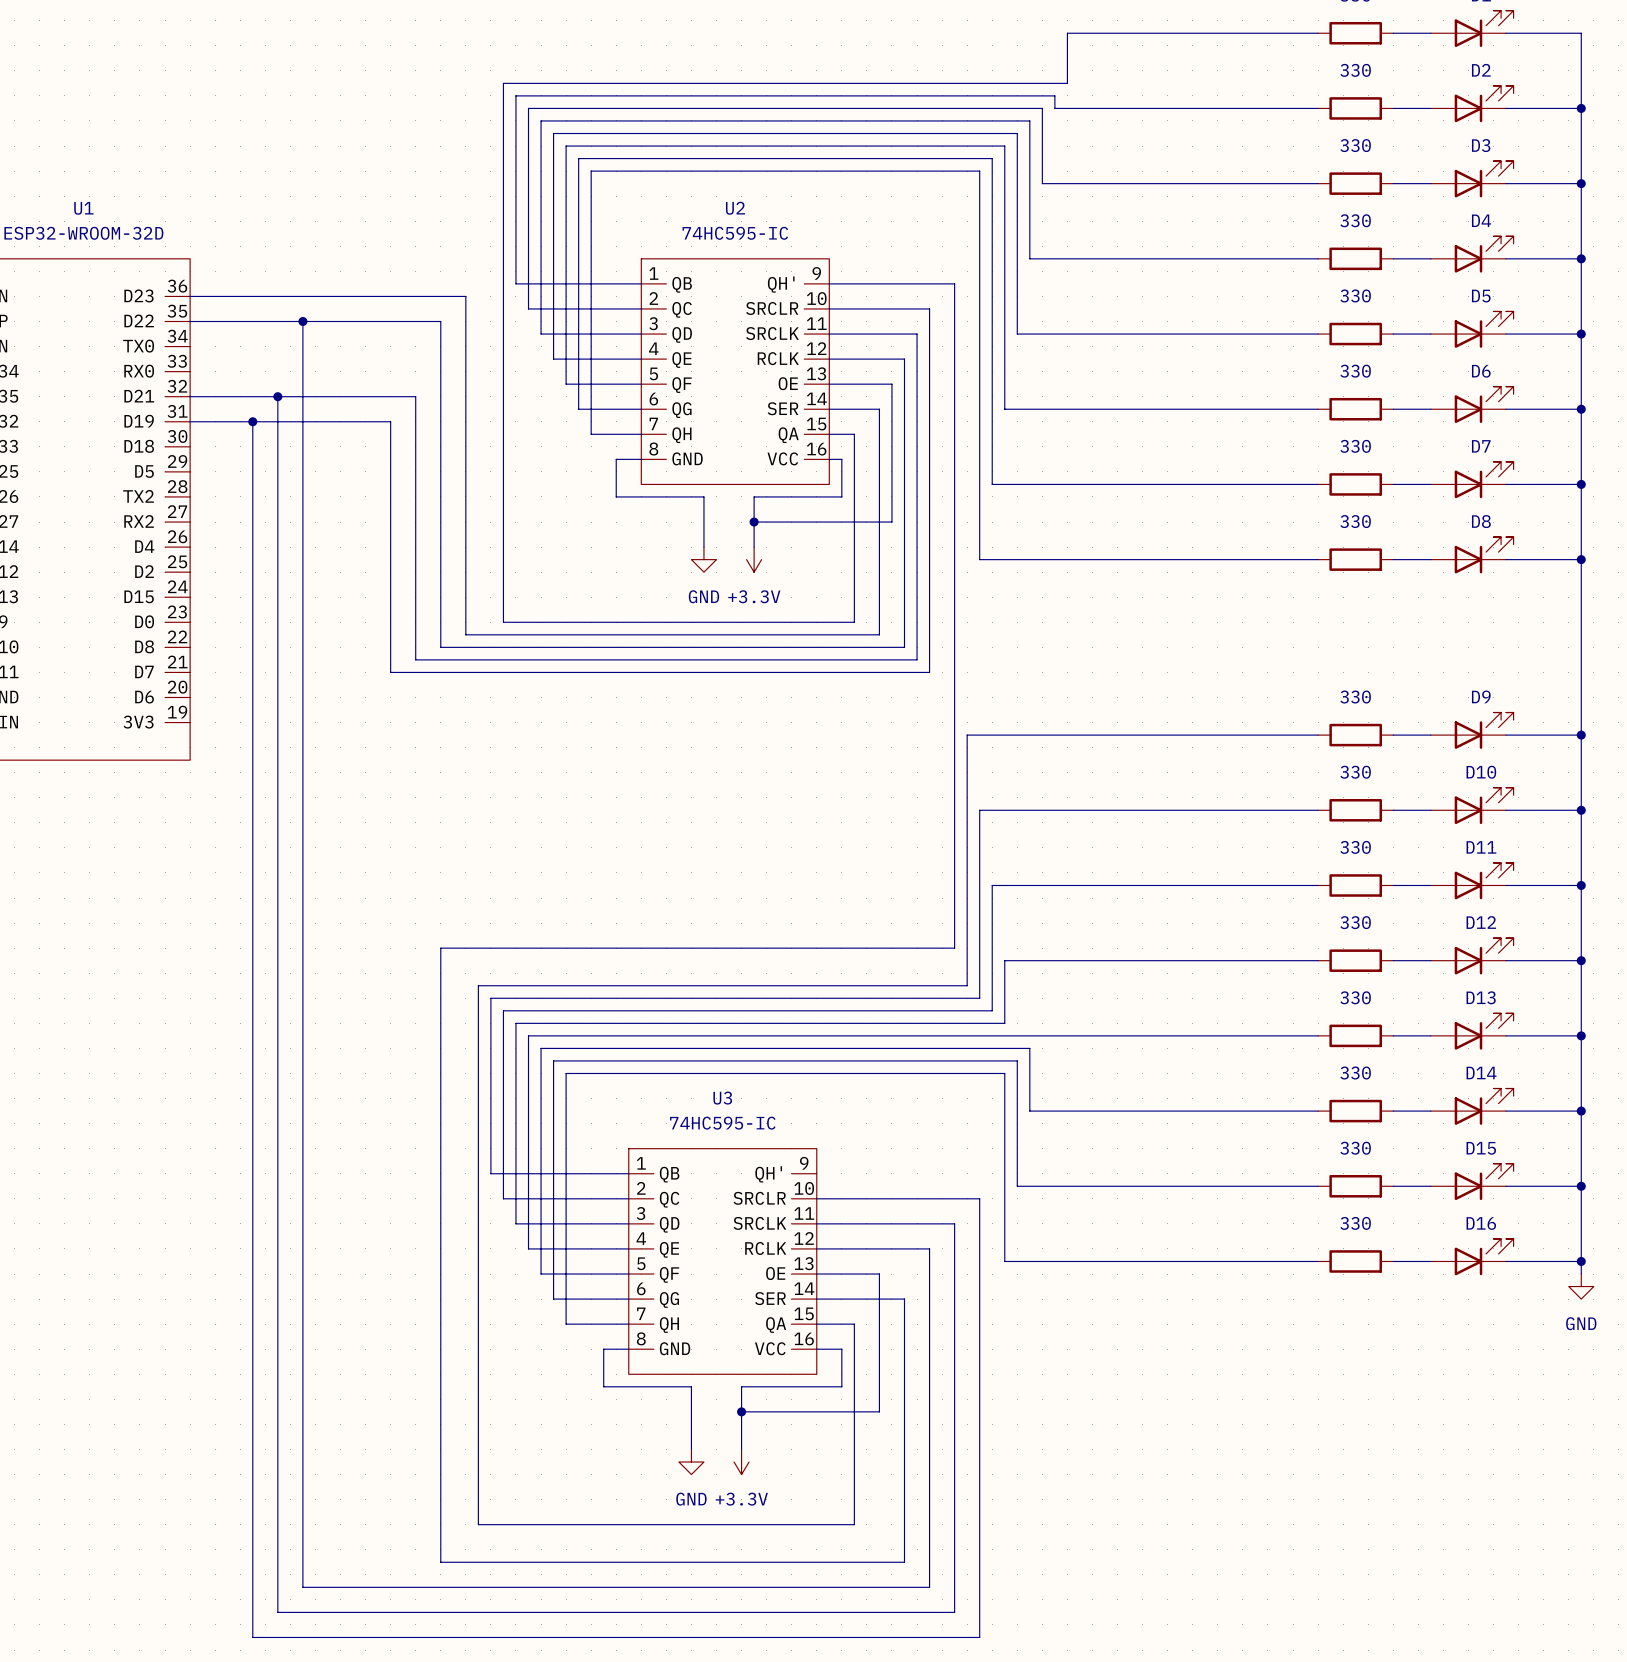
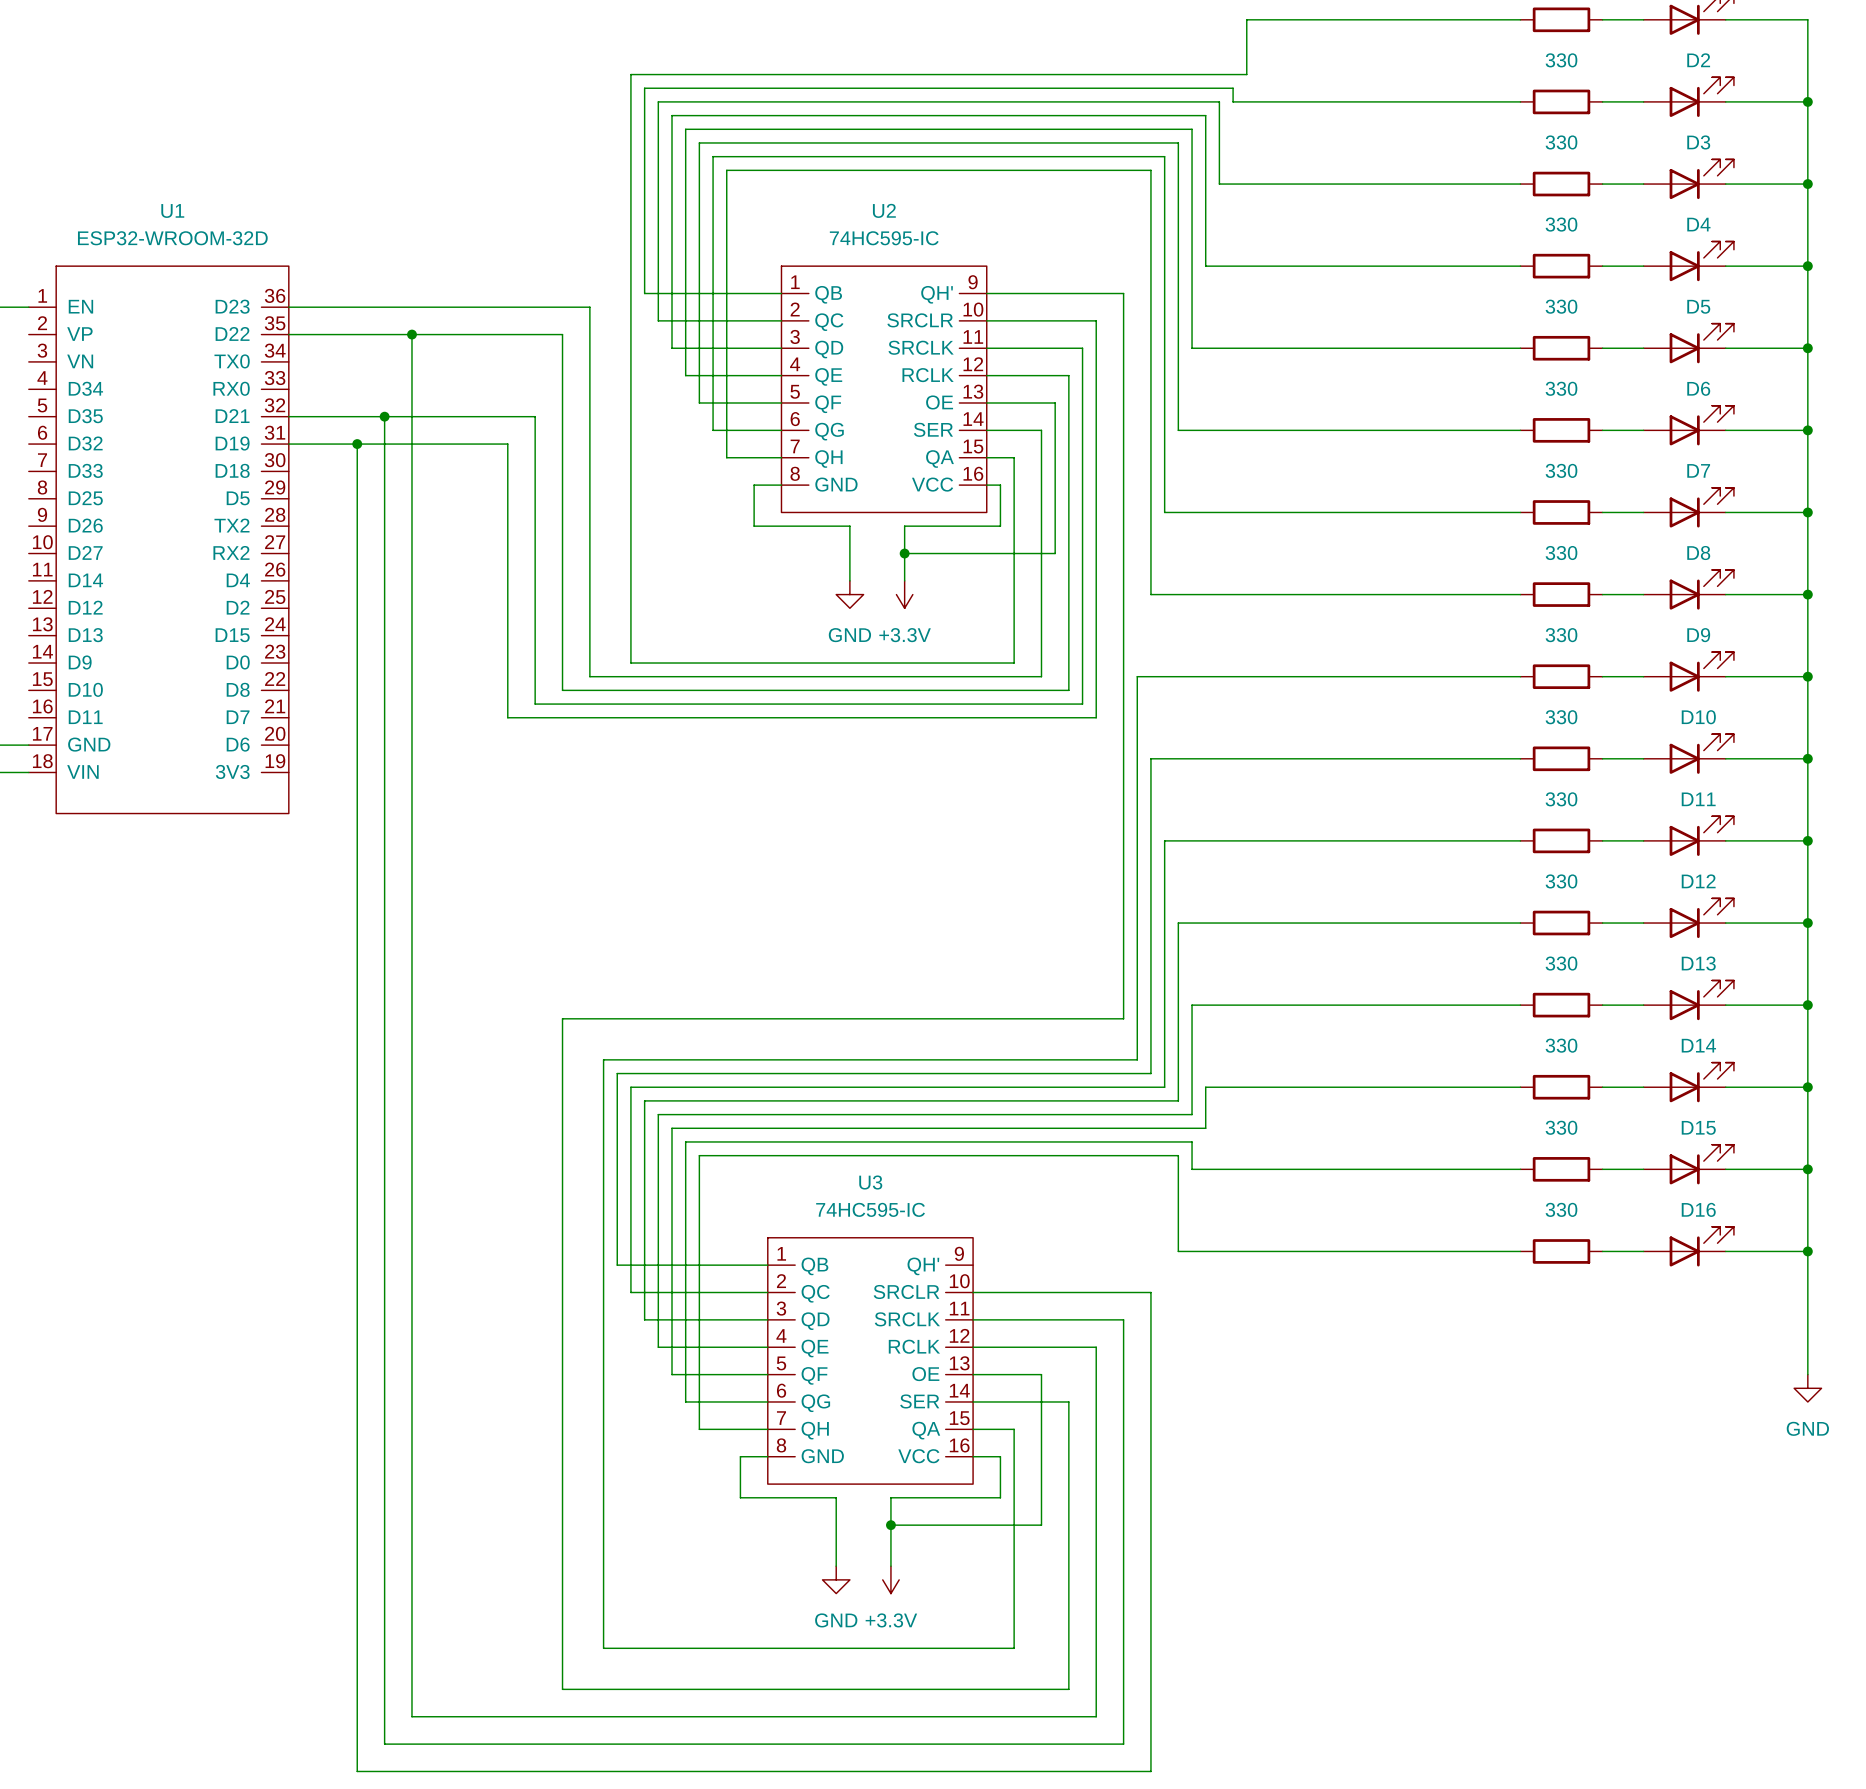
part: none -> 330 (1561, 676)
junction: none -> (1807, 676)
part: none -> 330 (1561, 758)
junction: none -> (1807, 758)
D9 position: (1472, 730) -> (1688, 671)
wire: (967, 735) (1318, 735) -> (1137, 786) (1137, 676) (1520, 676)
part: 330 (1355, 735) -> none
wire: (1393, 735) (1430, 735) -> (1602, 676) (1643, 676)
wire: (1506, 735) (1581, 735) -> (1725, 676) (1807, 676)
junction: (1581, 735) -> none
part: none -> 330 (1561, 840)
junction: none -> (1807, 840)
D10 position: (1472, 805) -> (1688, 754)
wire: (979, 810) (1318, 810) -> (1150, 868) (1150, 758) (1520, 758)
part: 330 (1355, 810) -> none
wire: (1393, 810) (1430, 810) -> (1602, 758) (1643, 758)
wire: (1506, 810) (1581, 810) -> (1725, 758) (1807, 758)
junction: (1581, 810) -> none
part: none -> 330 (1561, 923)
junction: none -> (1807, 923)
D11 position: (1472, 881) -> (1688, 836)
wire: (992, 885) (1318, 885) -> (1164, 950) (1164, 840) (1520, 840)
part: 330 (1355, 885) -> none
wire: (1393, 885) (1430, 885) -> (1602, 840) (1643, 840)
wire: (1506, 885) (1581, 885) -> (1725, 840) (1807, 840)
junction: (1581, 885) -> none
part: none -> 330 (1561, 1005)
junction: none -> (1807, 1005)
D12 position: (1472, 956) -> (1688, 918)
wire: (1004, 960) (1318, 960) -> (1178, 1032) (1178, 923) (1520, 923)
part: 330 (1355, 960) -> none
wire: (1393, 960) (1430, 960) -> (1602, 923) (1643, 923)
wire: (1506, 960) (1581, 960) -> (1725, 923) (1807, 923)
junction: (1581, 960) -> none
part: none -> 330 (1561, 1087)
junction: none -> (1807, 1087)
D13 position: (1472, 1031) -> (1688, 1000)
wire: (1017, 1035) (1318, 1035) -> (1192, 1114) (1192, 1005) (1520, 1005)
part: 330 (1355, 1035) -> none
wire: (1393, 1035) (1430, 1035) -> (1602, 1005) (1643, 1005)
wire: (1506, 1035) (1581, 1035) -> (1725, 1005) (1807, 1005)
junction: (1581, 1035) -> none
wire: (1029, 1048) (1029, 1111) (1318, 1111) -> (1205, 1128) (1205, 1087) (1520, 1087)
wire: (1017, 1086) (1017, 1186) (1318, 1186) -> (1192, 1169) (1520, 1169)
part: none -> 330 (1561, 1169)
junction: none -> (1807, 1169)
D14 position: (1472, 1106) -> (1688, 1082)
part: 330 (1355, 1111) -> none
wire: (1393, 1111) (1430, 1111) -> (1602, 1087) (1643, 1087)
wire: (1506, 1111) (1581, 1111) -> (1725, 1087) (1807, 1087)
junction: (1581, 1111) -> none
wire: (1004, 1161) (1004, 1261) (1318, 1261) -> (1178, 1251) (1520, 1251)
part: none -> 330 (1561, 1251)
junction: none -> (1807, 1251)
D15 position: (1472, 1181) -> (1688, 1164)
part: 330 (1355, 1186) -> none
wire: (1393, 1186) (1430, 1186) -> (1602, 1169) (1643, 1169)
wire: (1506, 1186) (1581, 1186) -> (1725, 1169) (1807, 1169)
junction: (1581, 1186) -> none
D16 position: (1472, 1257) -> (1688, 1246)
part: 330 (1355, 1261) -> none
wire: (1393, 1261) (1430, 1261) -> (1602, 1251) (1643, 1251)
wire: (1506, 1261) (1581, 1261) -> (1725, 1251) (1807, 1251)
junction: (1581, 1261) -> none

